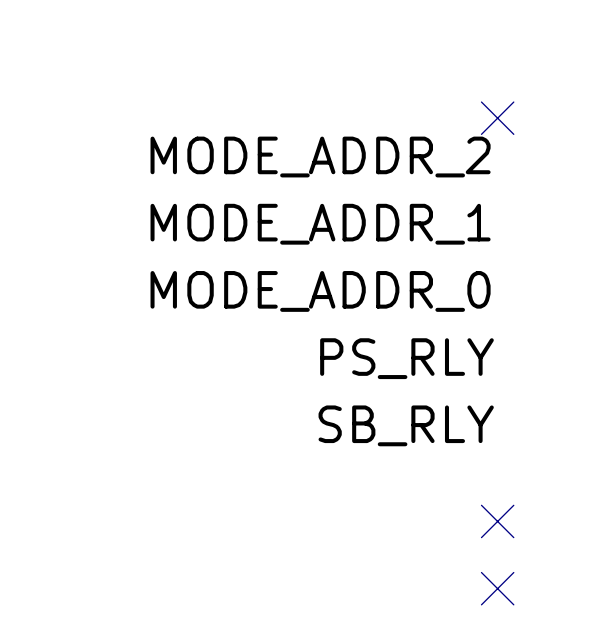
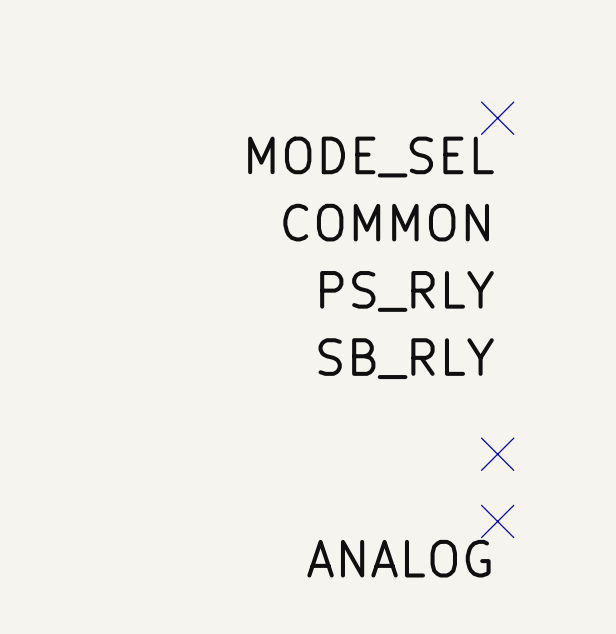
label: MODE_ADDR_2 (320, 157) -> MODE_SEL (370, 157)
label: MODE_ADDR_1 (320, 224) -> COMMON (386, 222)
label: MODE_ADDR_0 (320, 291) -> PS_RLY (406, 291)
label: PS_RLY (406, 358) -> SB_RLY (406, 358)
label: SB_RLY (406, 425) -> none
no-connect mark: none -> (497, 454)
label: none -> ANALOG (398, 558)
no-connect mark: (497, 588) -> none

